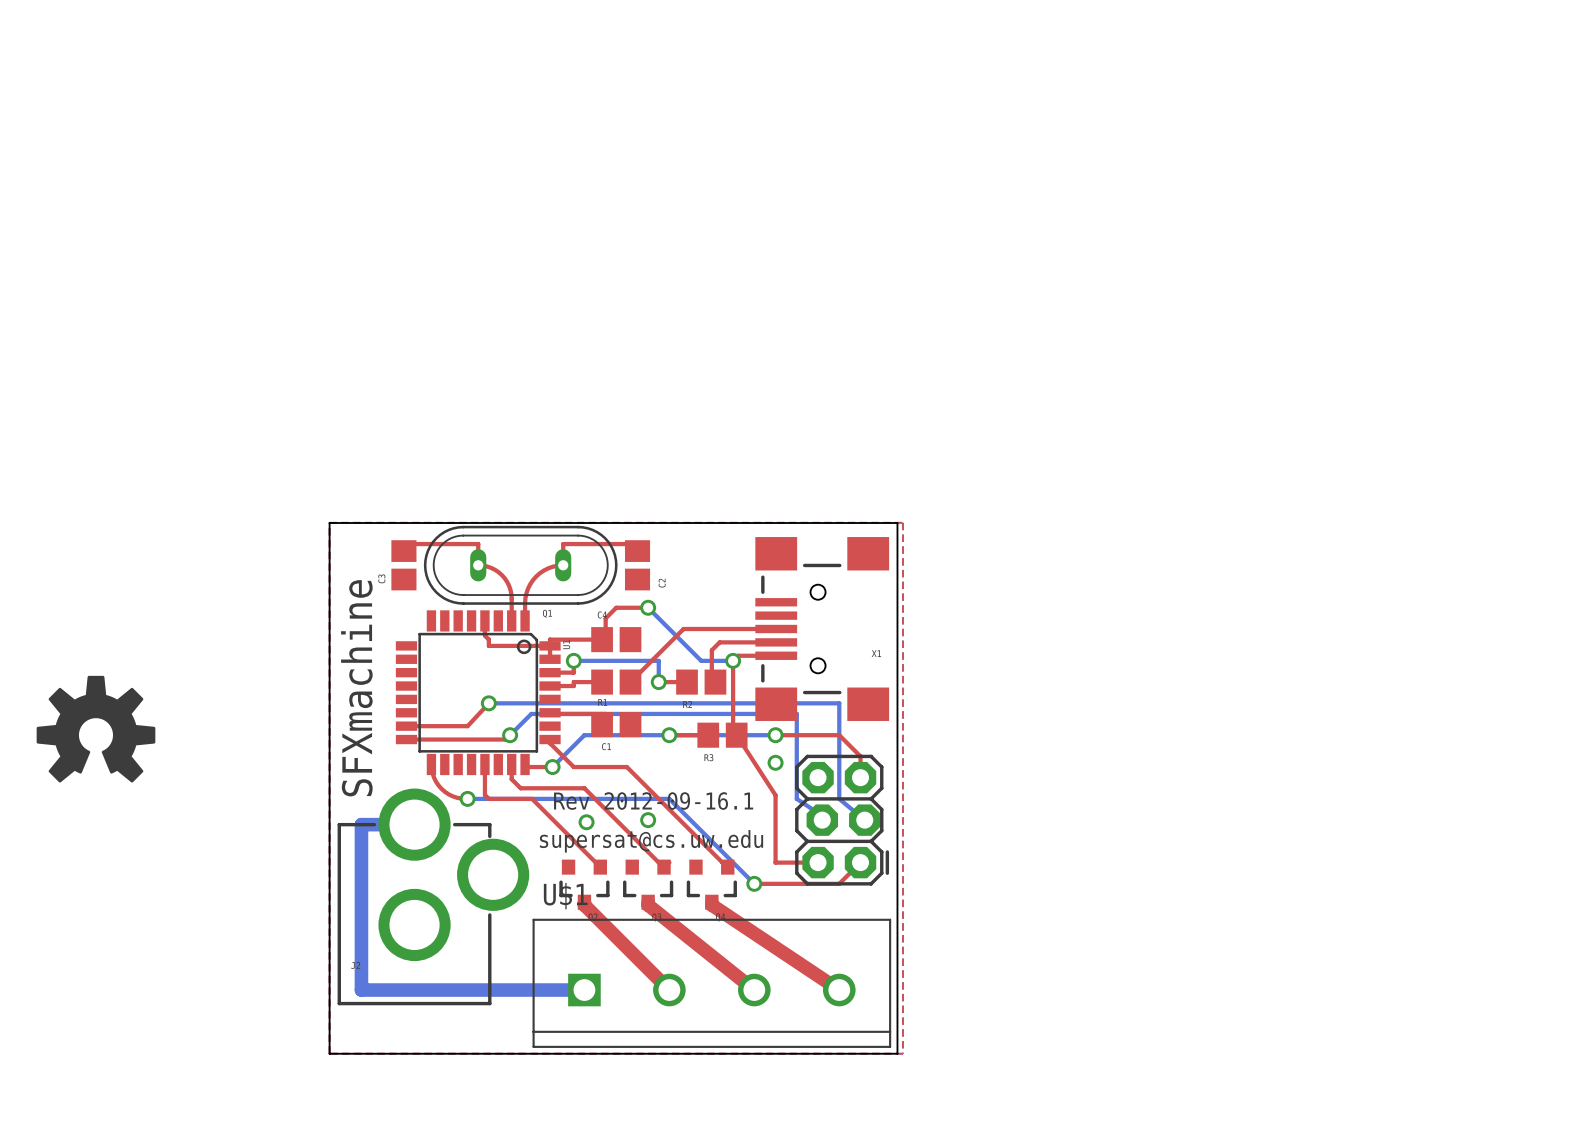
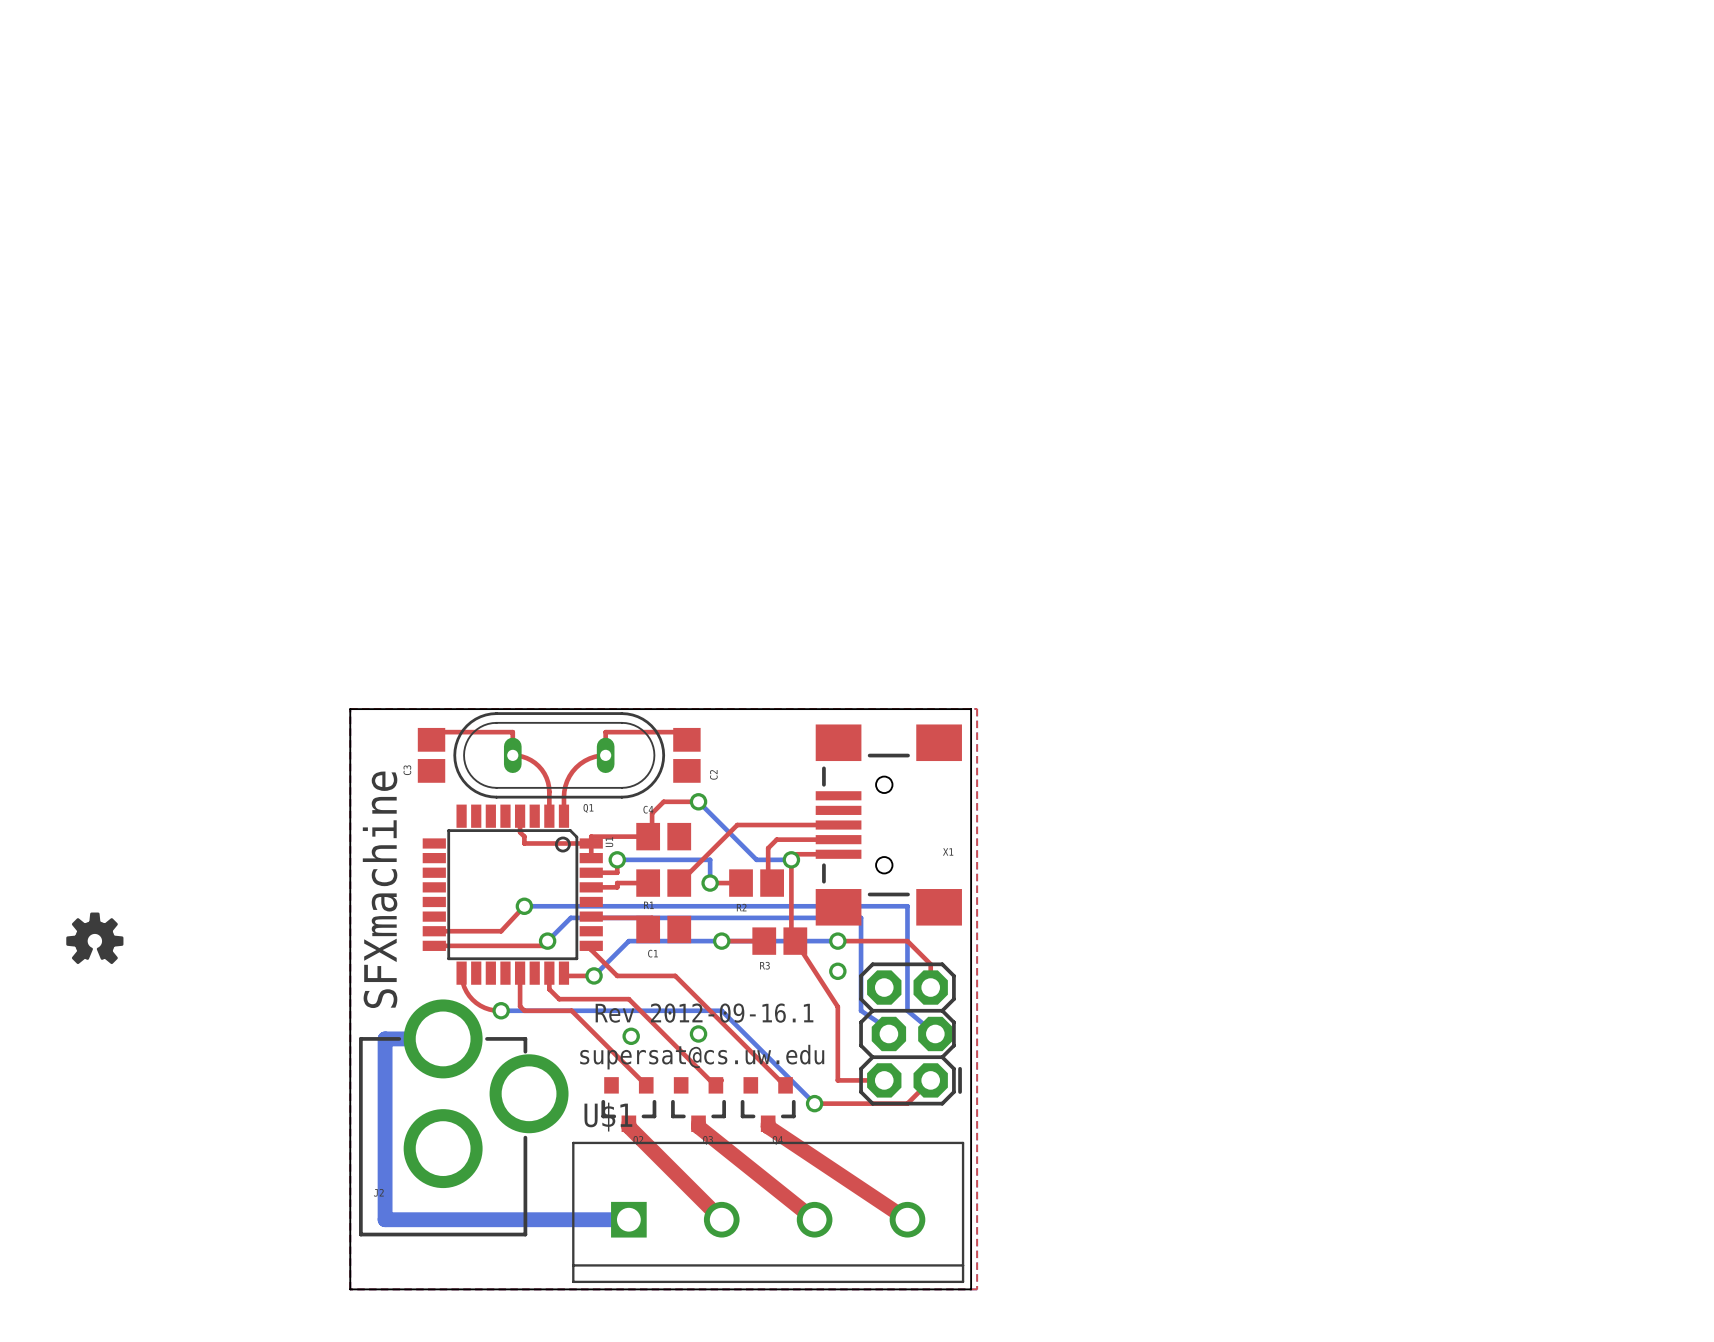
drawing shape: [36, 675, 156, 783] -> [66, 912, 124, 965]

